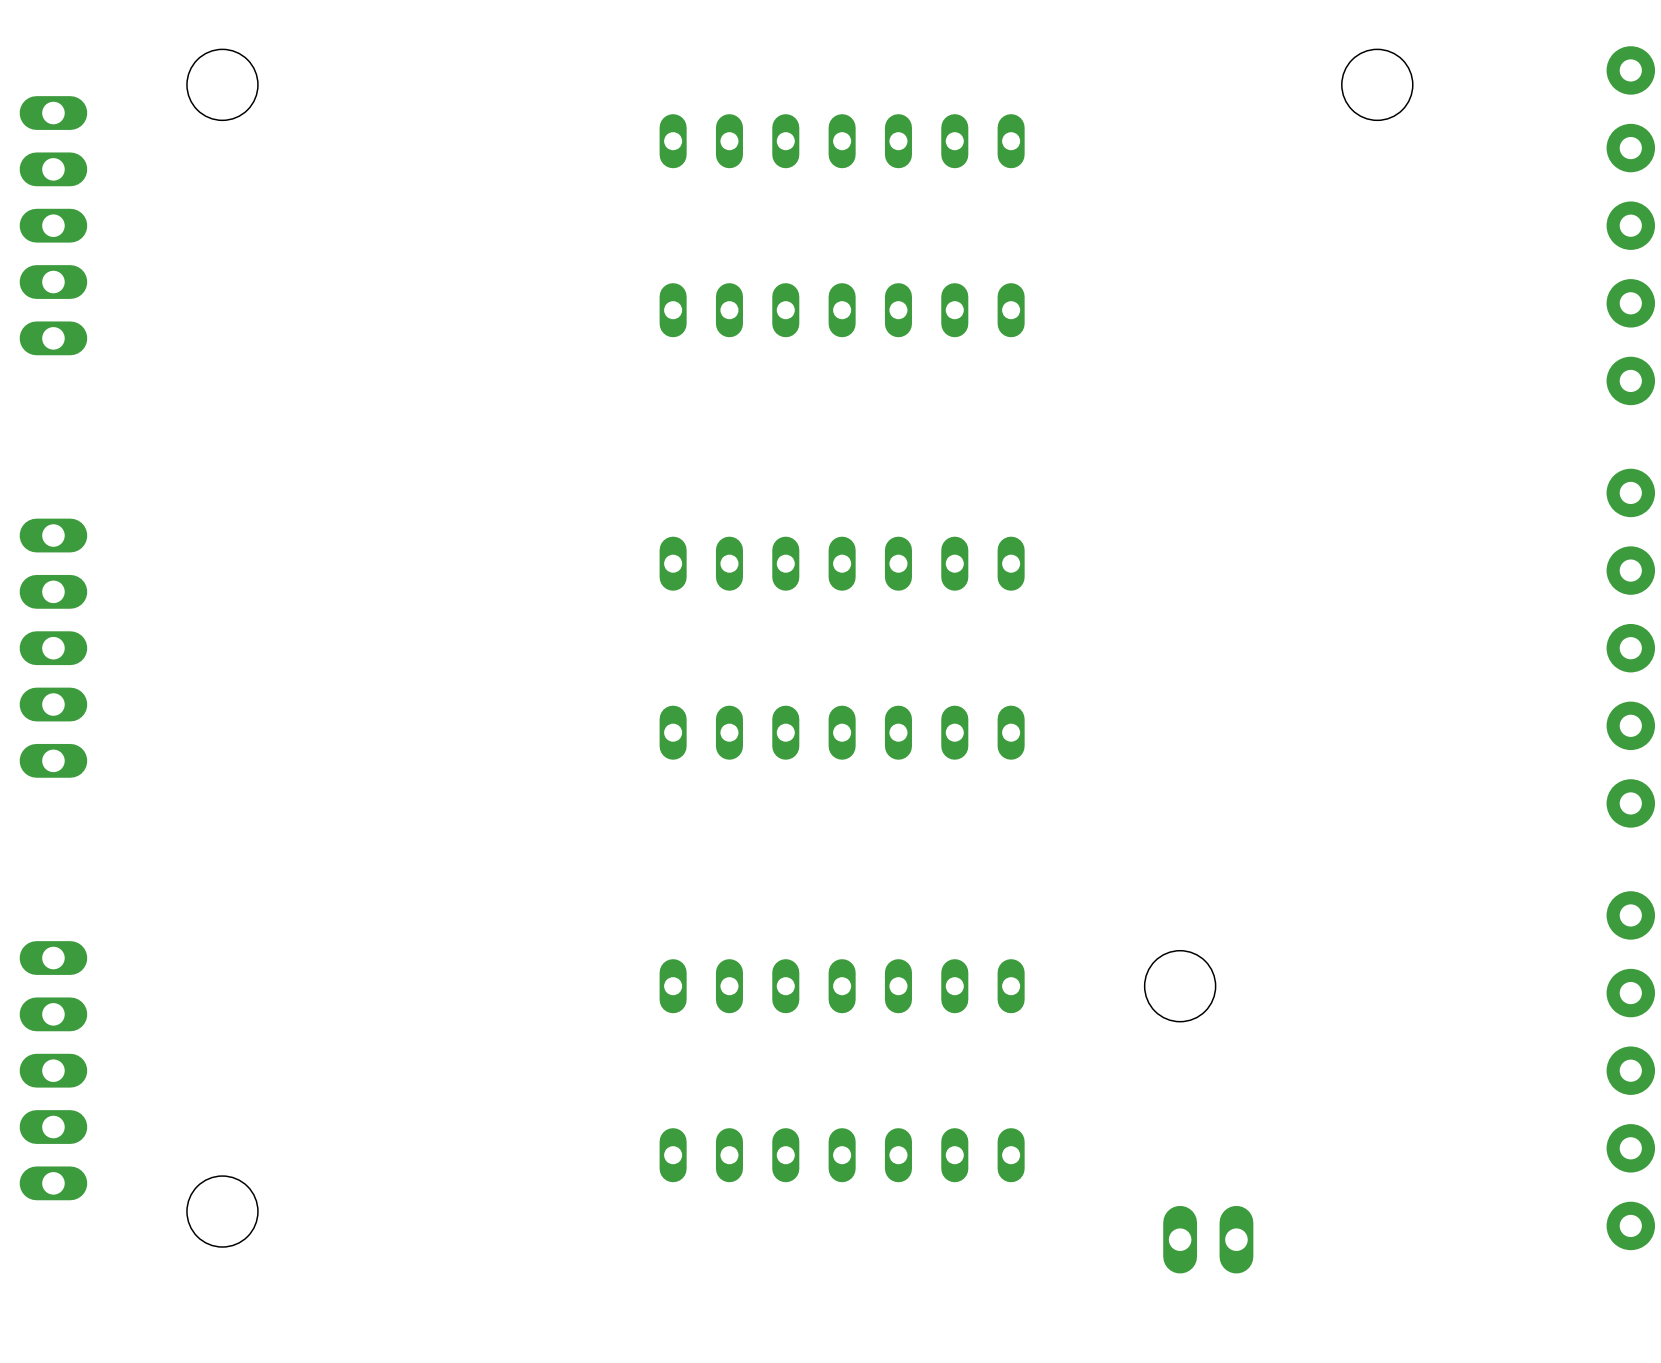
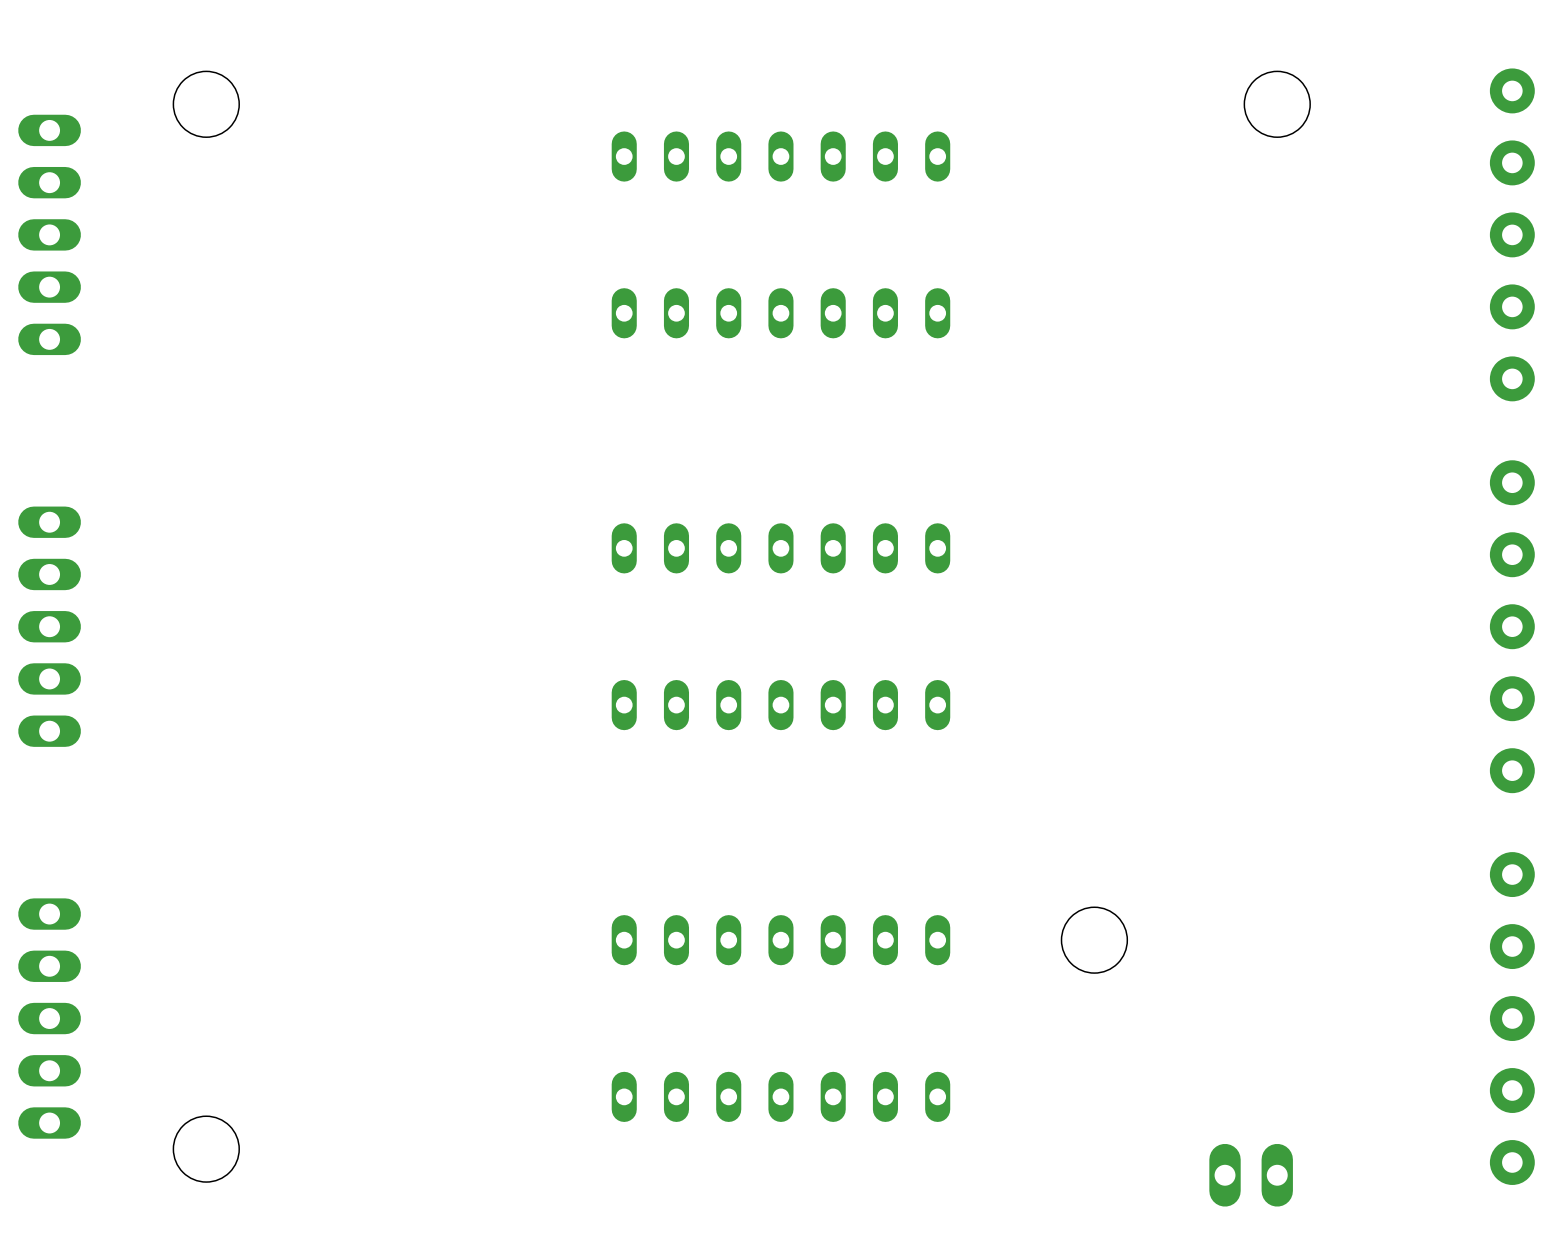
part position: (1208, 1239) -> (1251, 1175)

